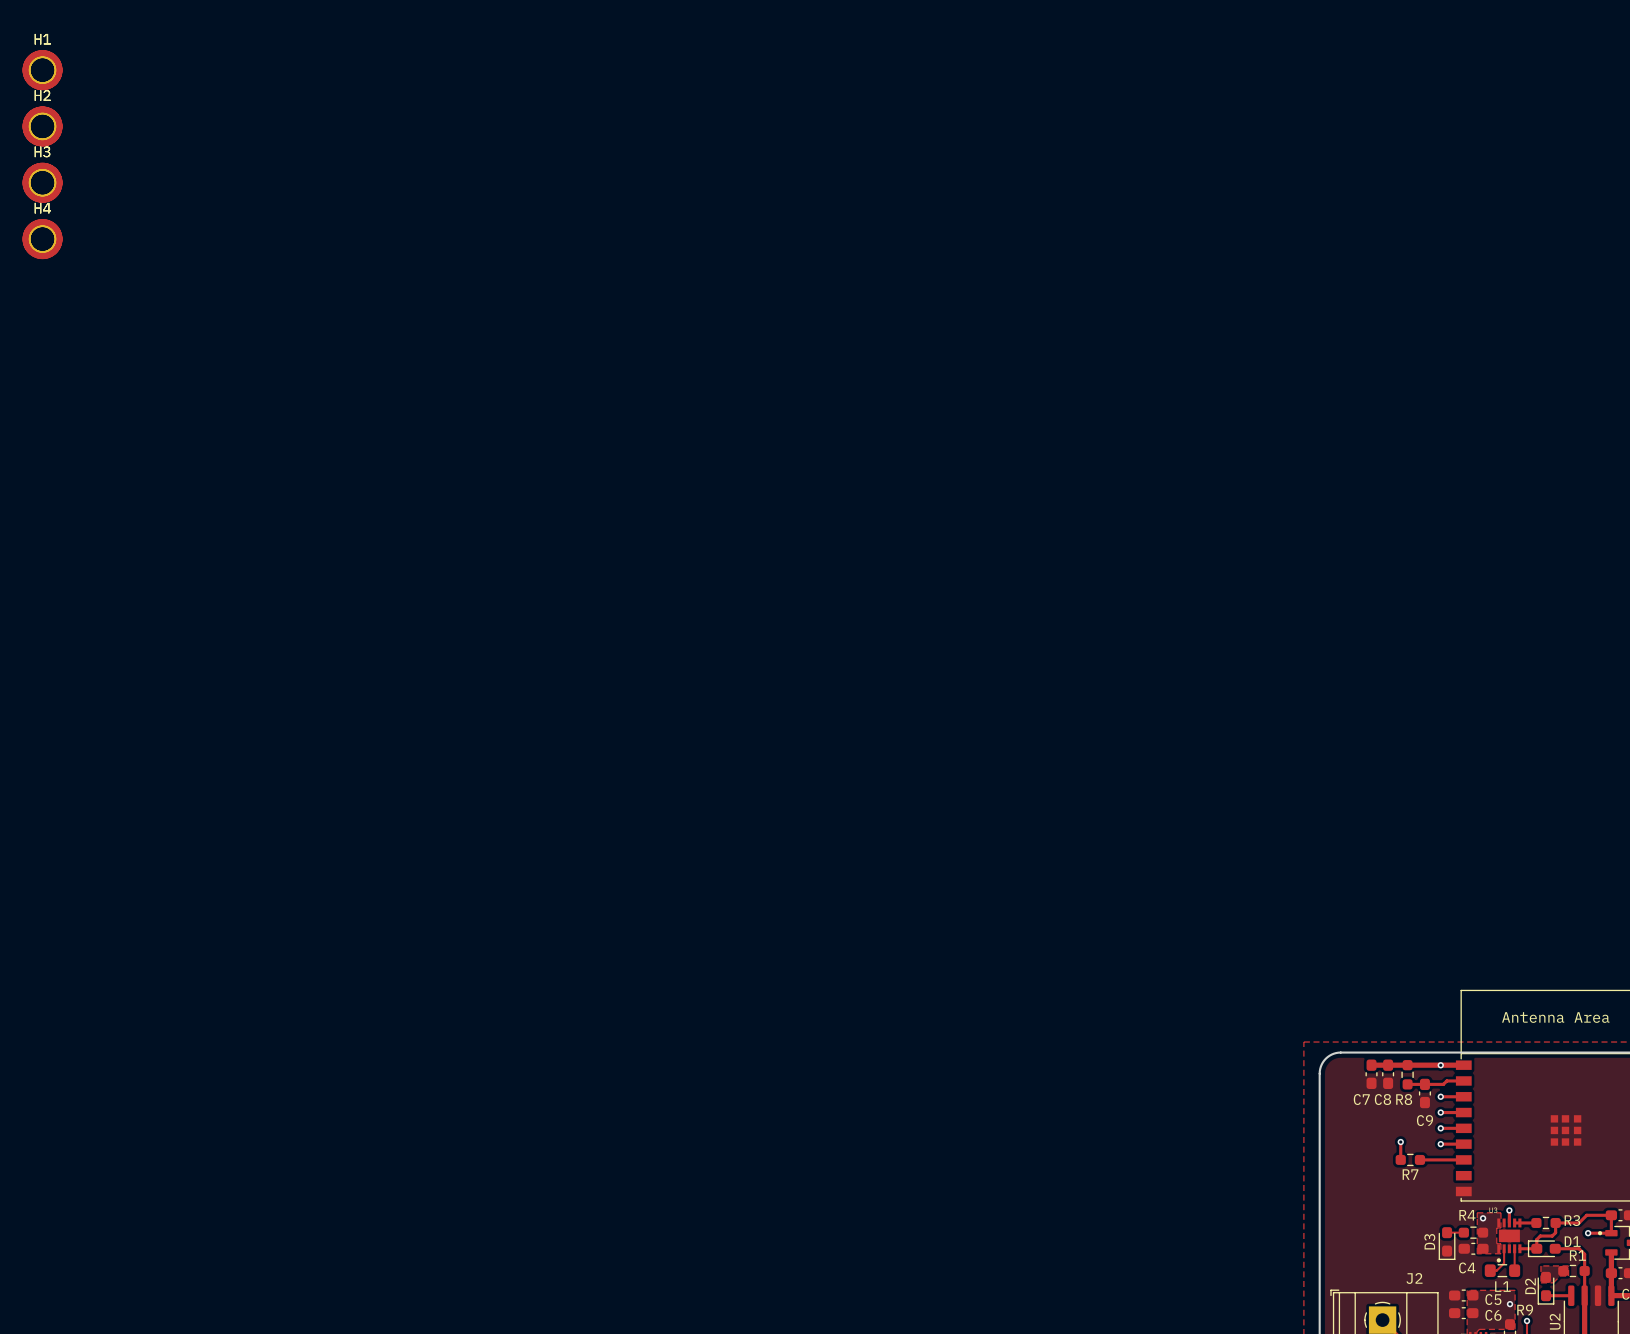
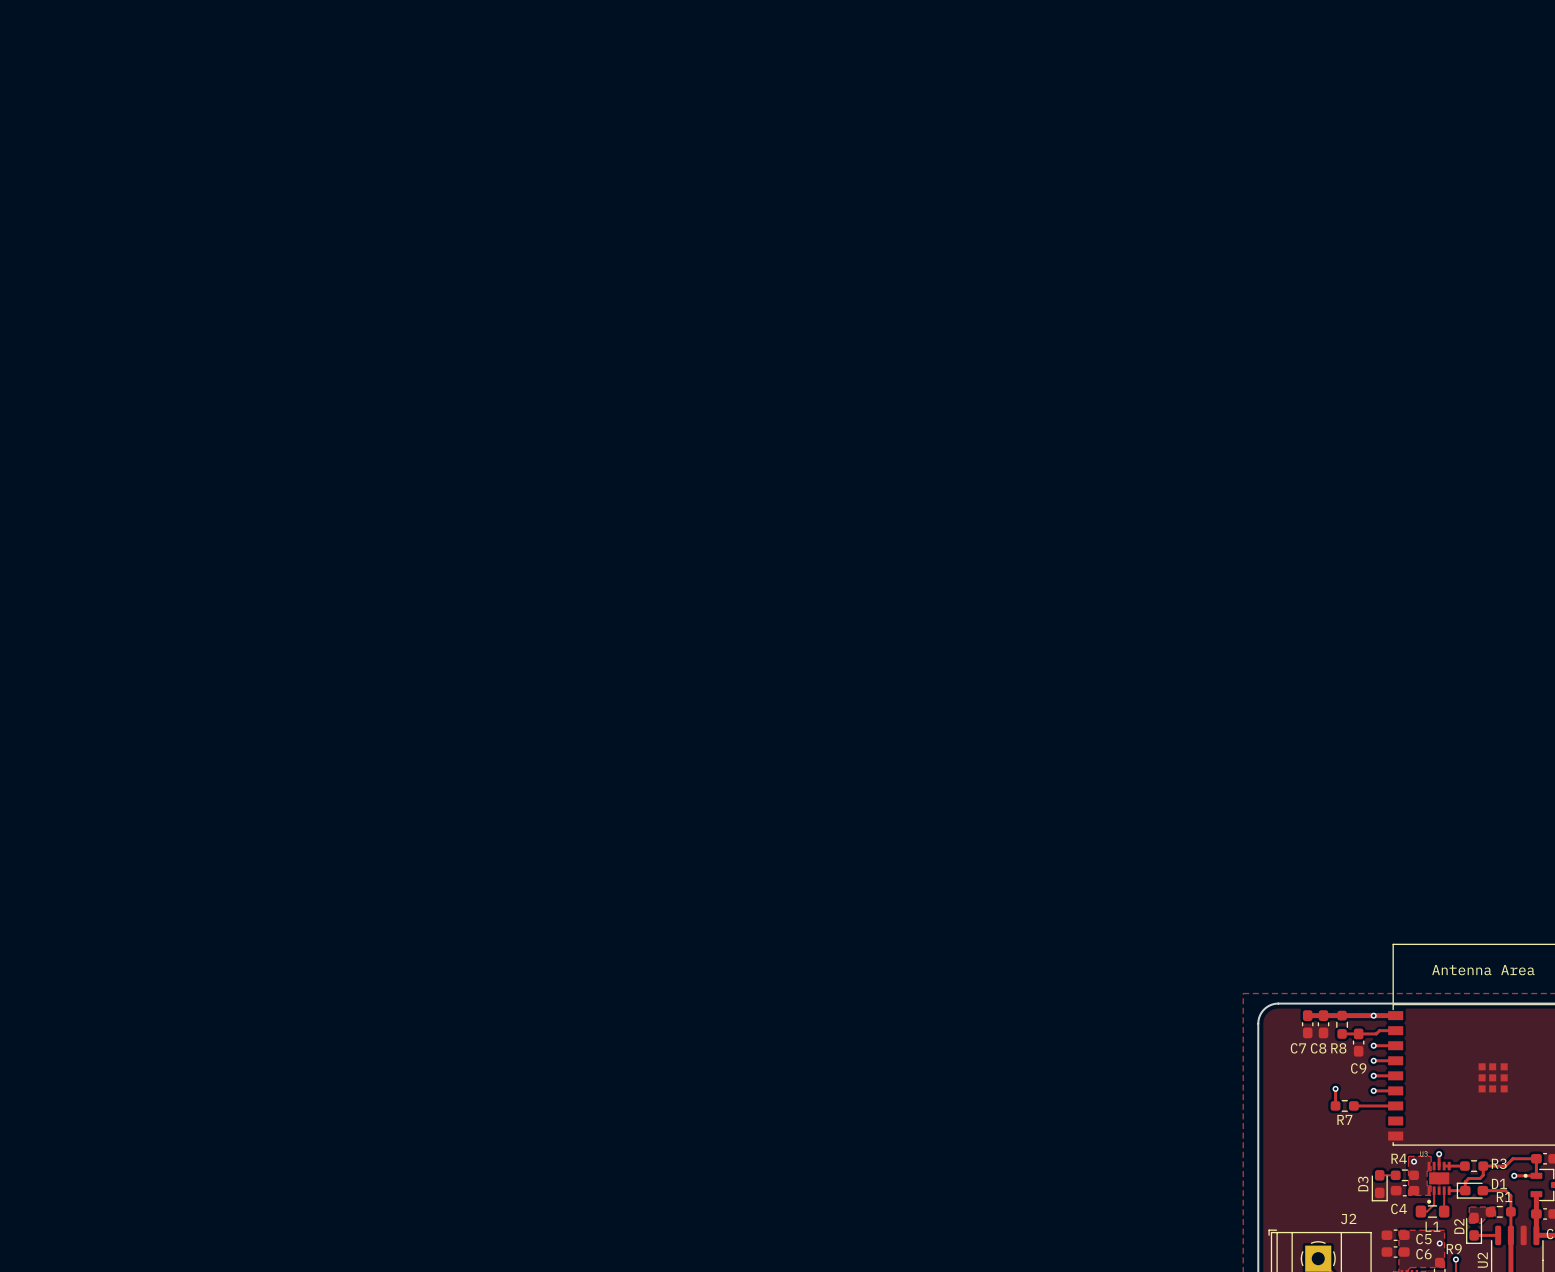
H1: (42, 70) -> none
H2: (42, 126) -> none
H3: (42, 182) -> none
H4: (42, 239) -> none

